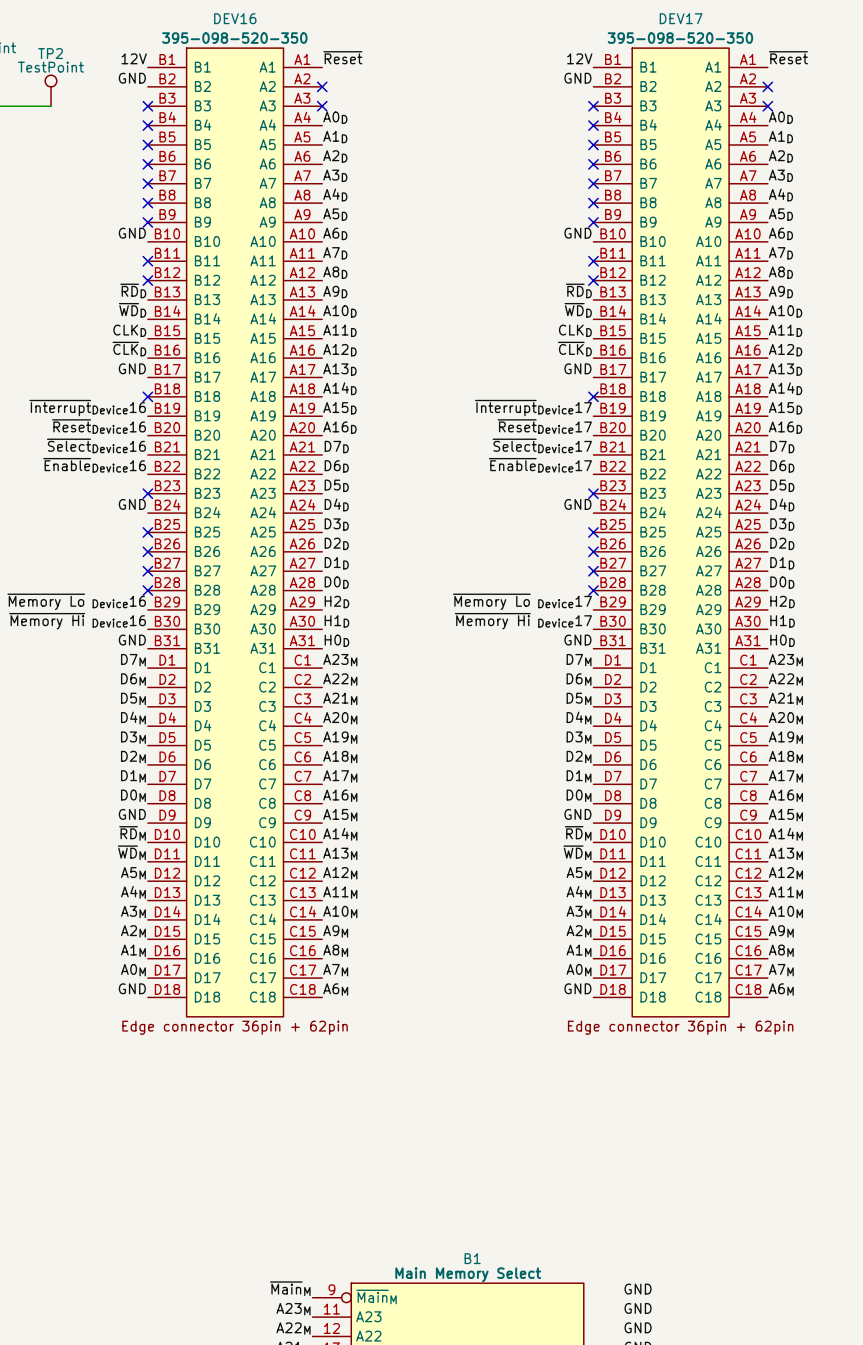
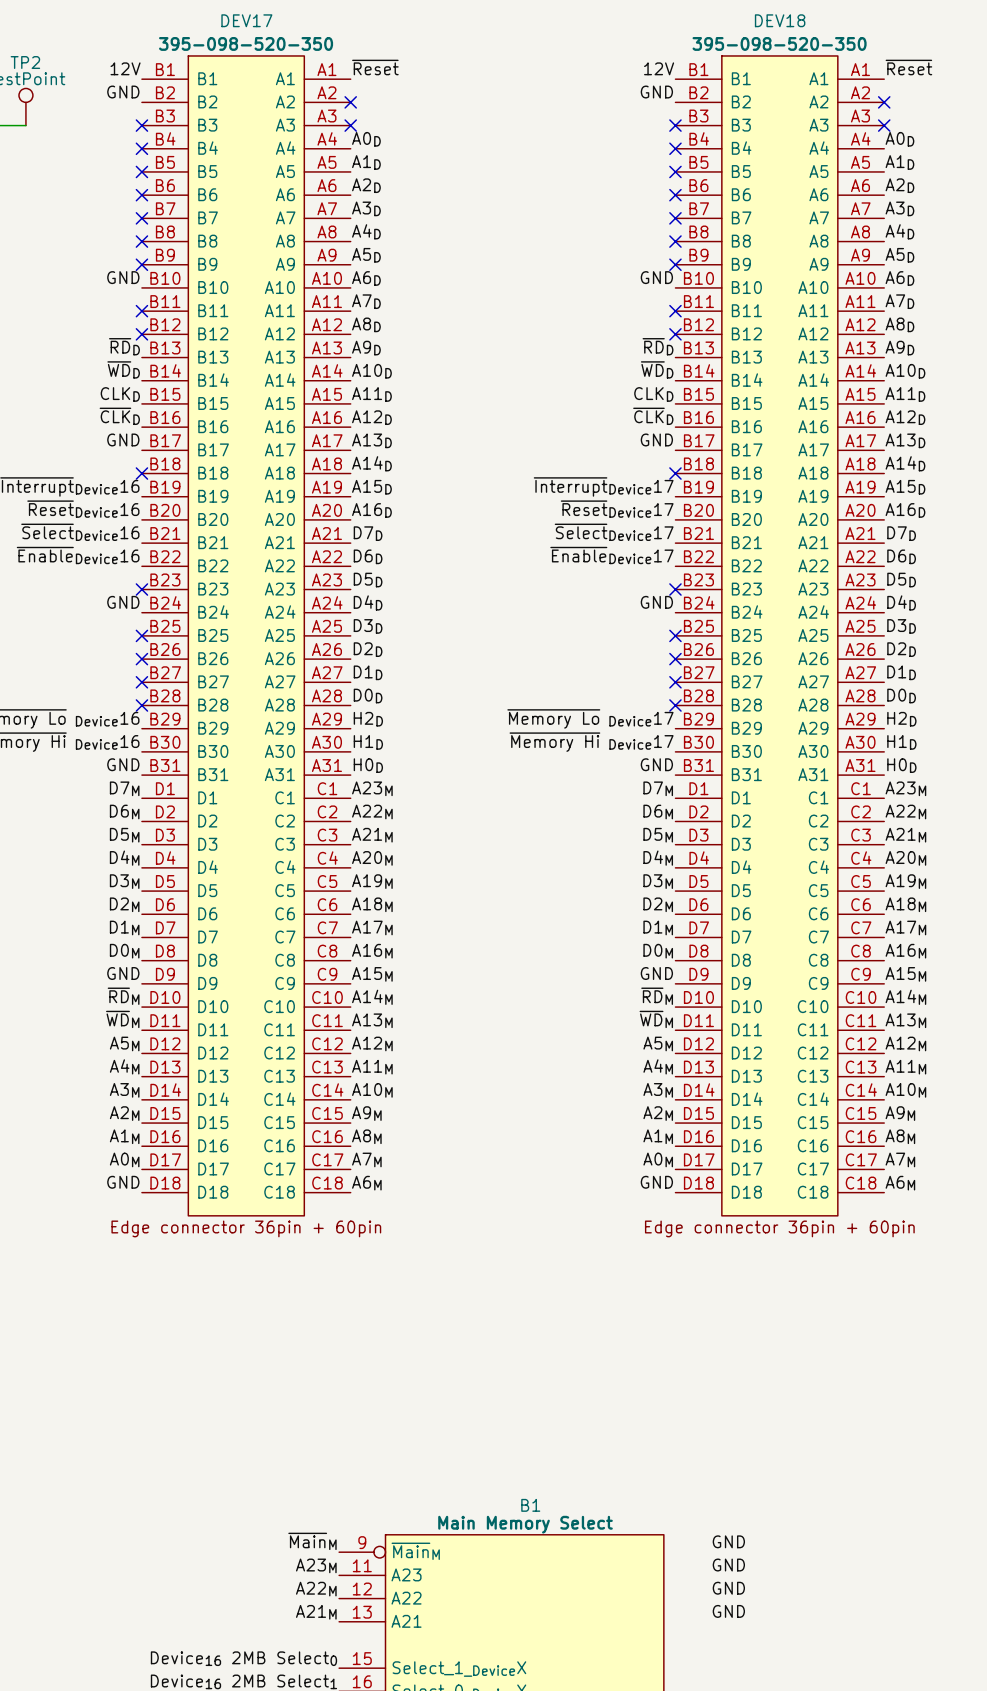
DEV16: 395-098-520-350 (235, 532) -> none
DEV17 position: (680, 532) -> (246, 635)
DEV18: none -> 395-098-520-350 (779, 635)
DEV17 text: Edge connector 36pin + 62pin (680, 1027) -> Edge connector 36pin + 60pin (246, 1228)

